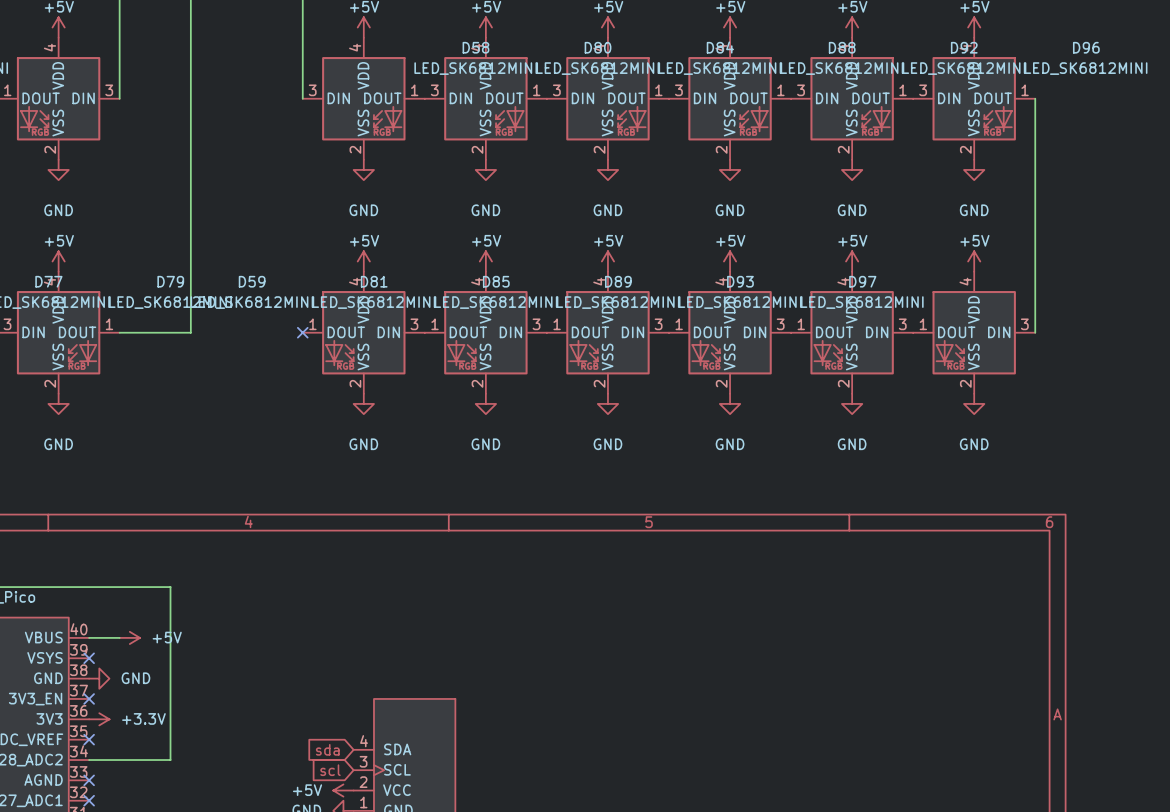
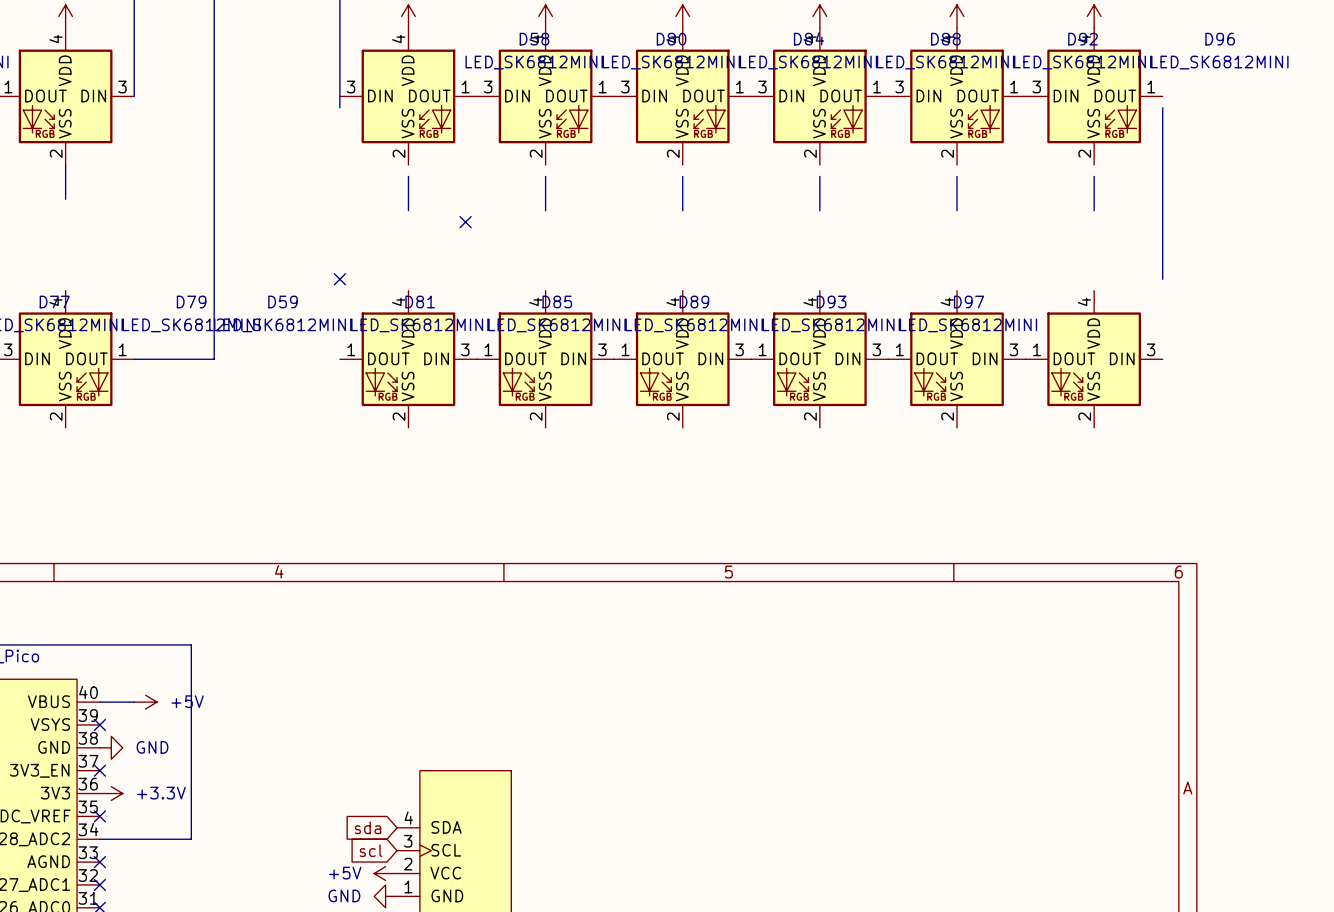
wire: none -> (339, 96) (339, 107)
wire: (1035, 98) (1035, 108) -> none
wire: none -> (65, 164) (65, 199)
power symbol: GND (58, 169) -> none
wire: none -> (408, 176) (408, 210)
power symbol: GND (363, 169) -> none
wire: none -> (545, 176) (545, 210)
power symbol: GND (485, 169) -> none
wire: none -> (682, 176) (682, 210)
power symbol: GND (607, 169) -> none
wire: none -> (819, 176) (819, 210)
power symbol: GND (730, 169) -> none
wire: none -> (957, 176) (957, 210)
power symbol: GND (852, 169) -> none
wire: none -> (1094, 176) (1094, 210)
power symbol: GND (974, 169) -> none
no-connect mark: none -> (465, 222)
power symbol: +5V (58, 261) -> none
no-connect mark: none -> (339, 279)
power symbol: +5V (363, 261) -> none
power symbol: +5V (485, 261) -> none
power symbol: +5V (607, 261) -> none
power symbol: +5V (730, 261) -> none
power symbol: +5V (852, 261) -> none
power symbol: +5V (974, 261) -> none
wire: (1035, 261) (1035, 332) -> none
no-connect mark: (302, 332) -> none
power symbol: GND (58, 403) -> none
power symbol: GND (363, 403) -> none
power symbol: GND (485, 403) -> none
power symbol: GND (607, 403) -> none
power symbol: GND (730, 403) -> none
power symbol: GND (852, 403) -> none
power symbol: GND (974, 403) -> none

